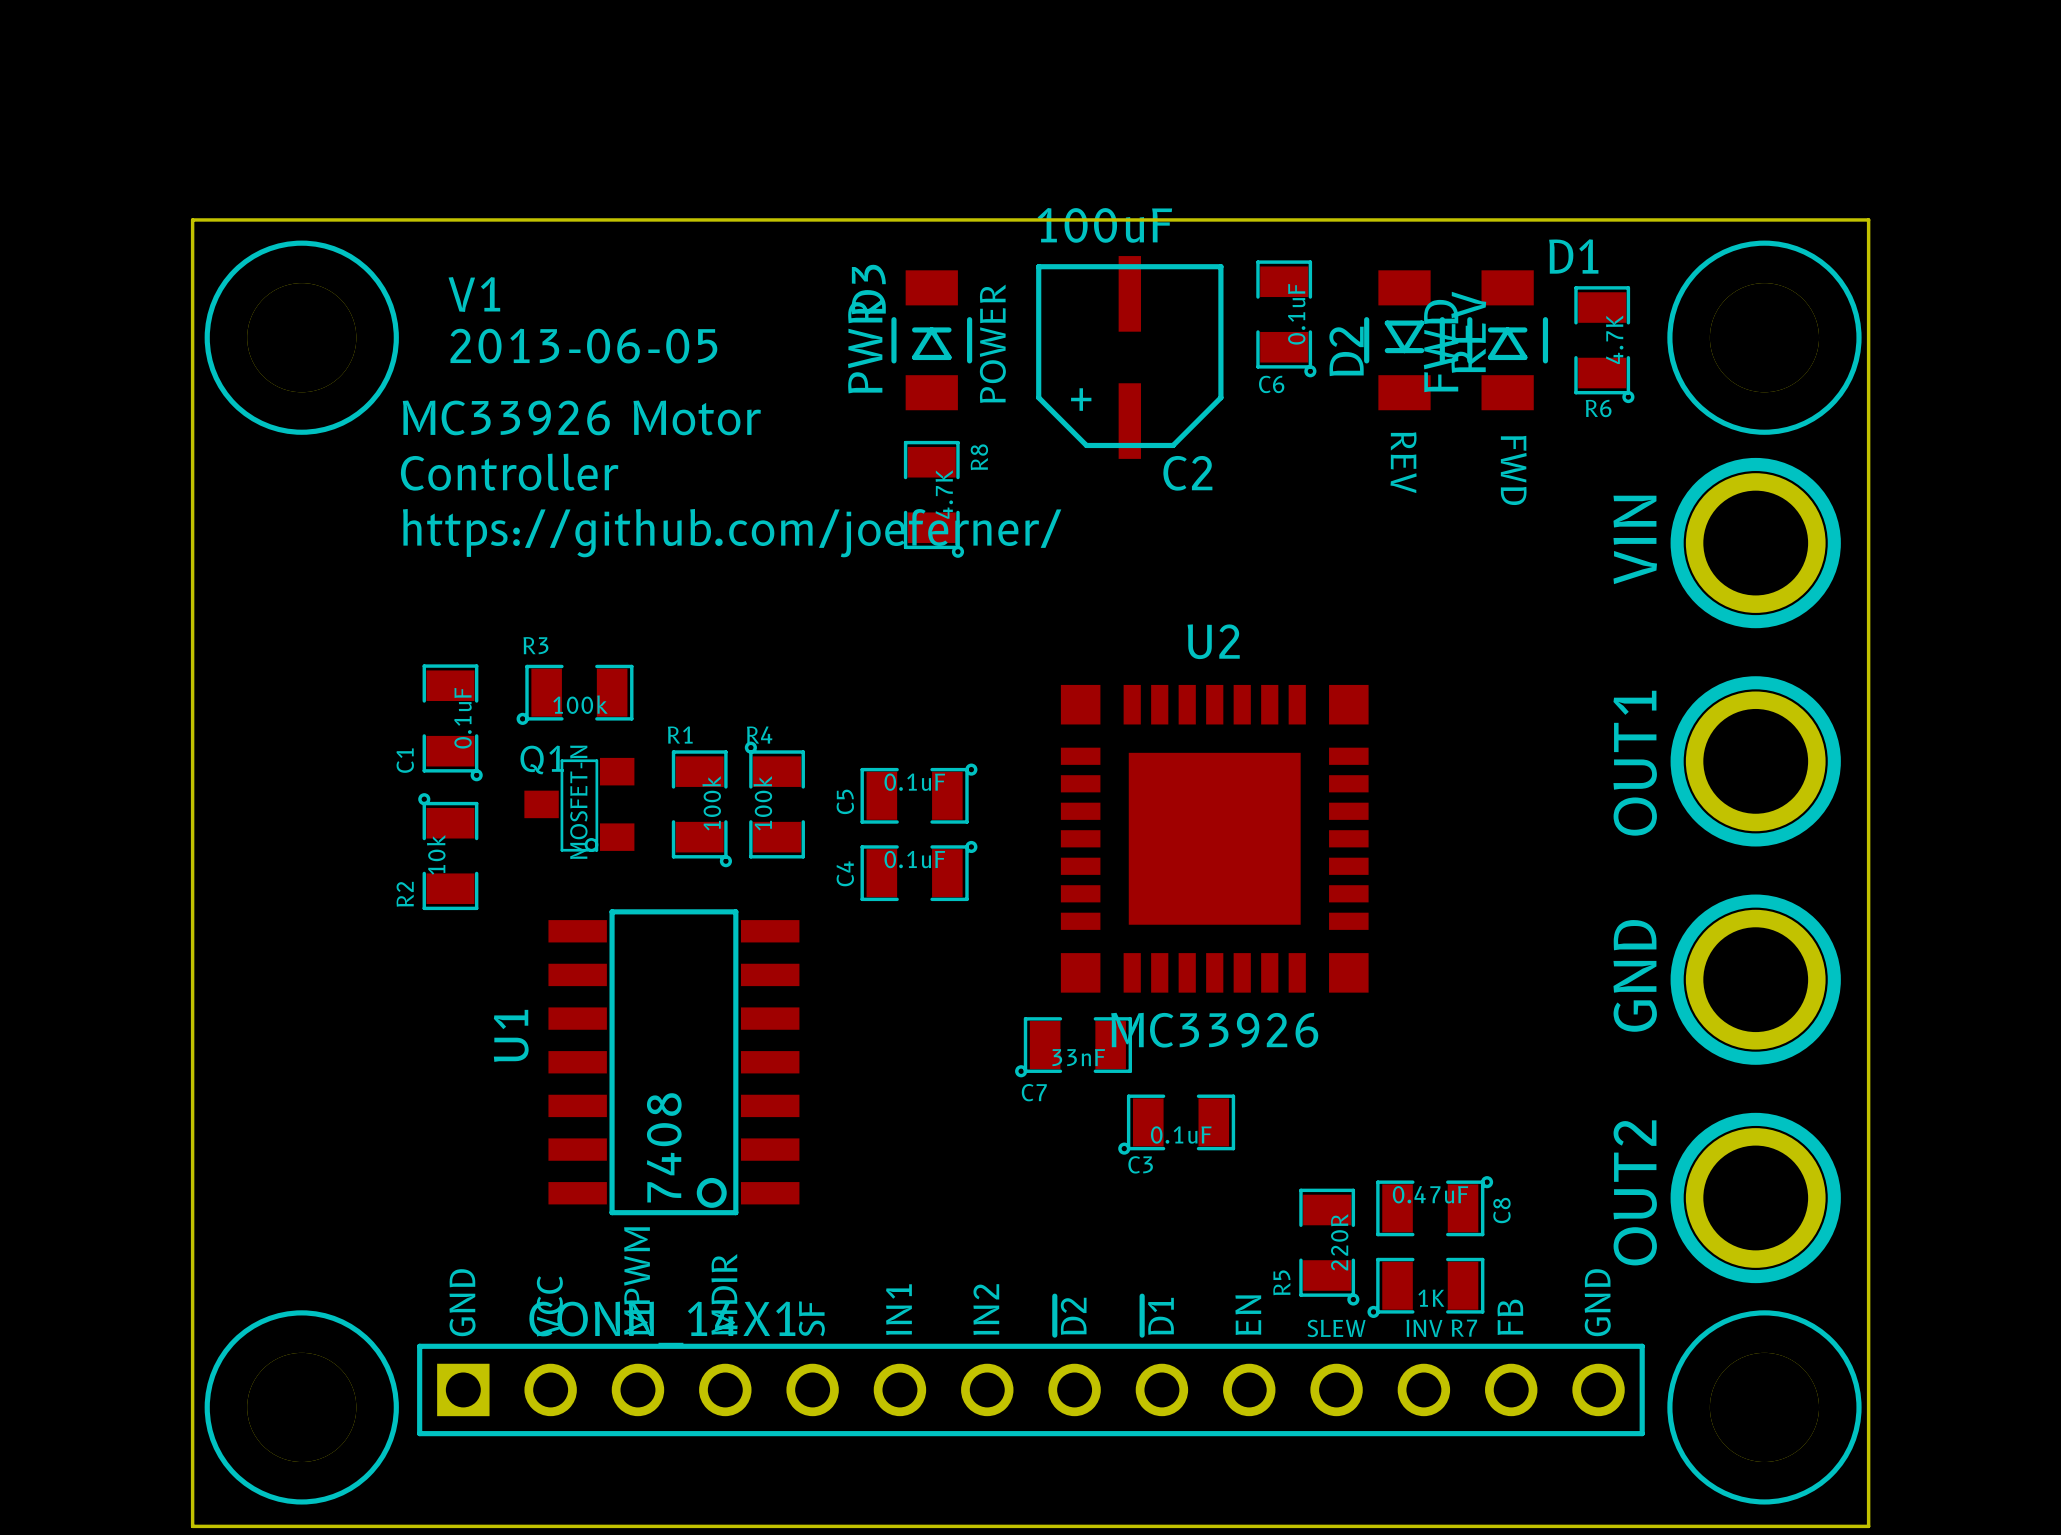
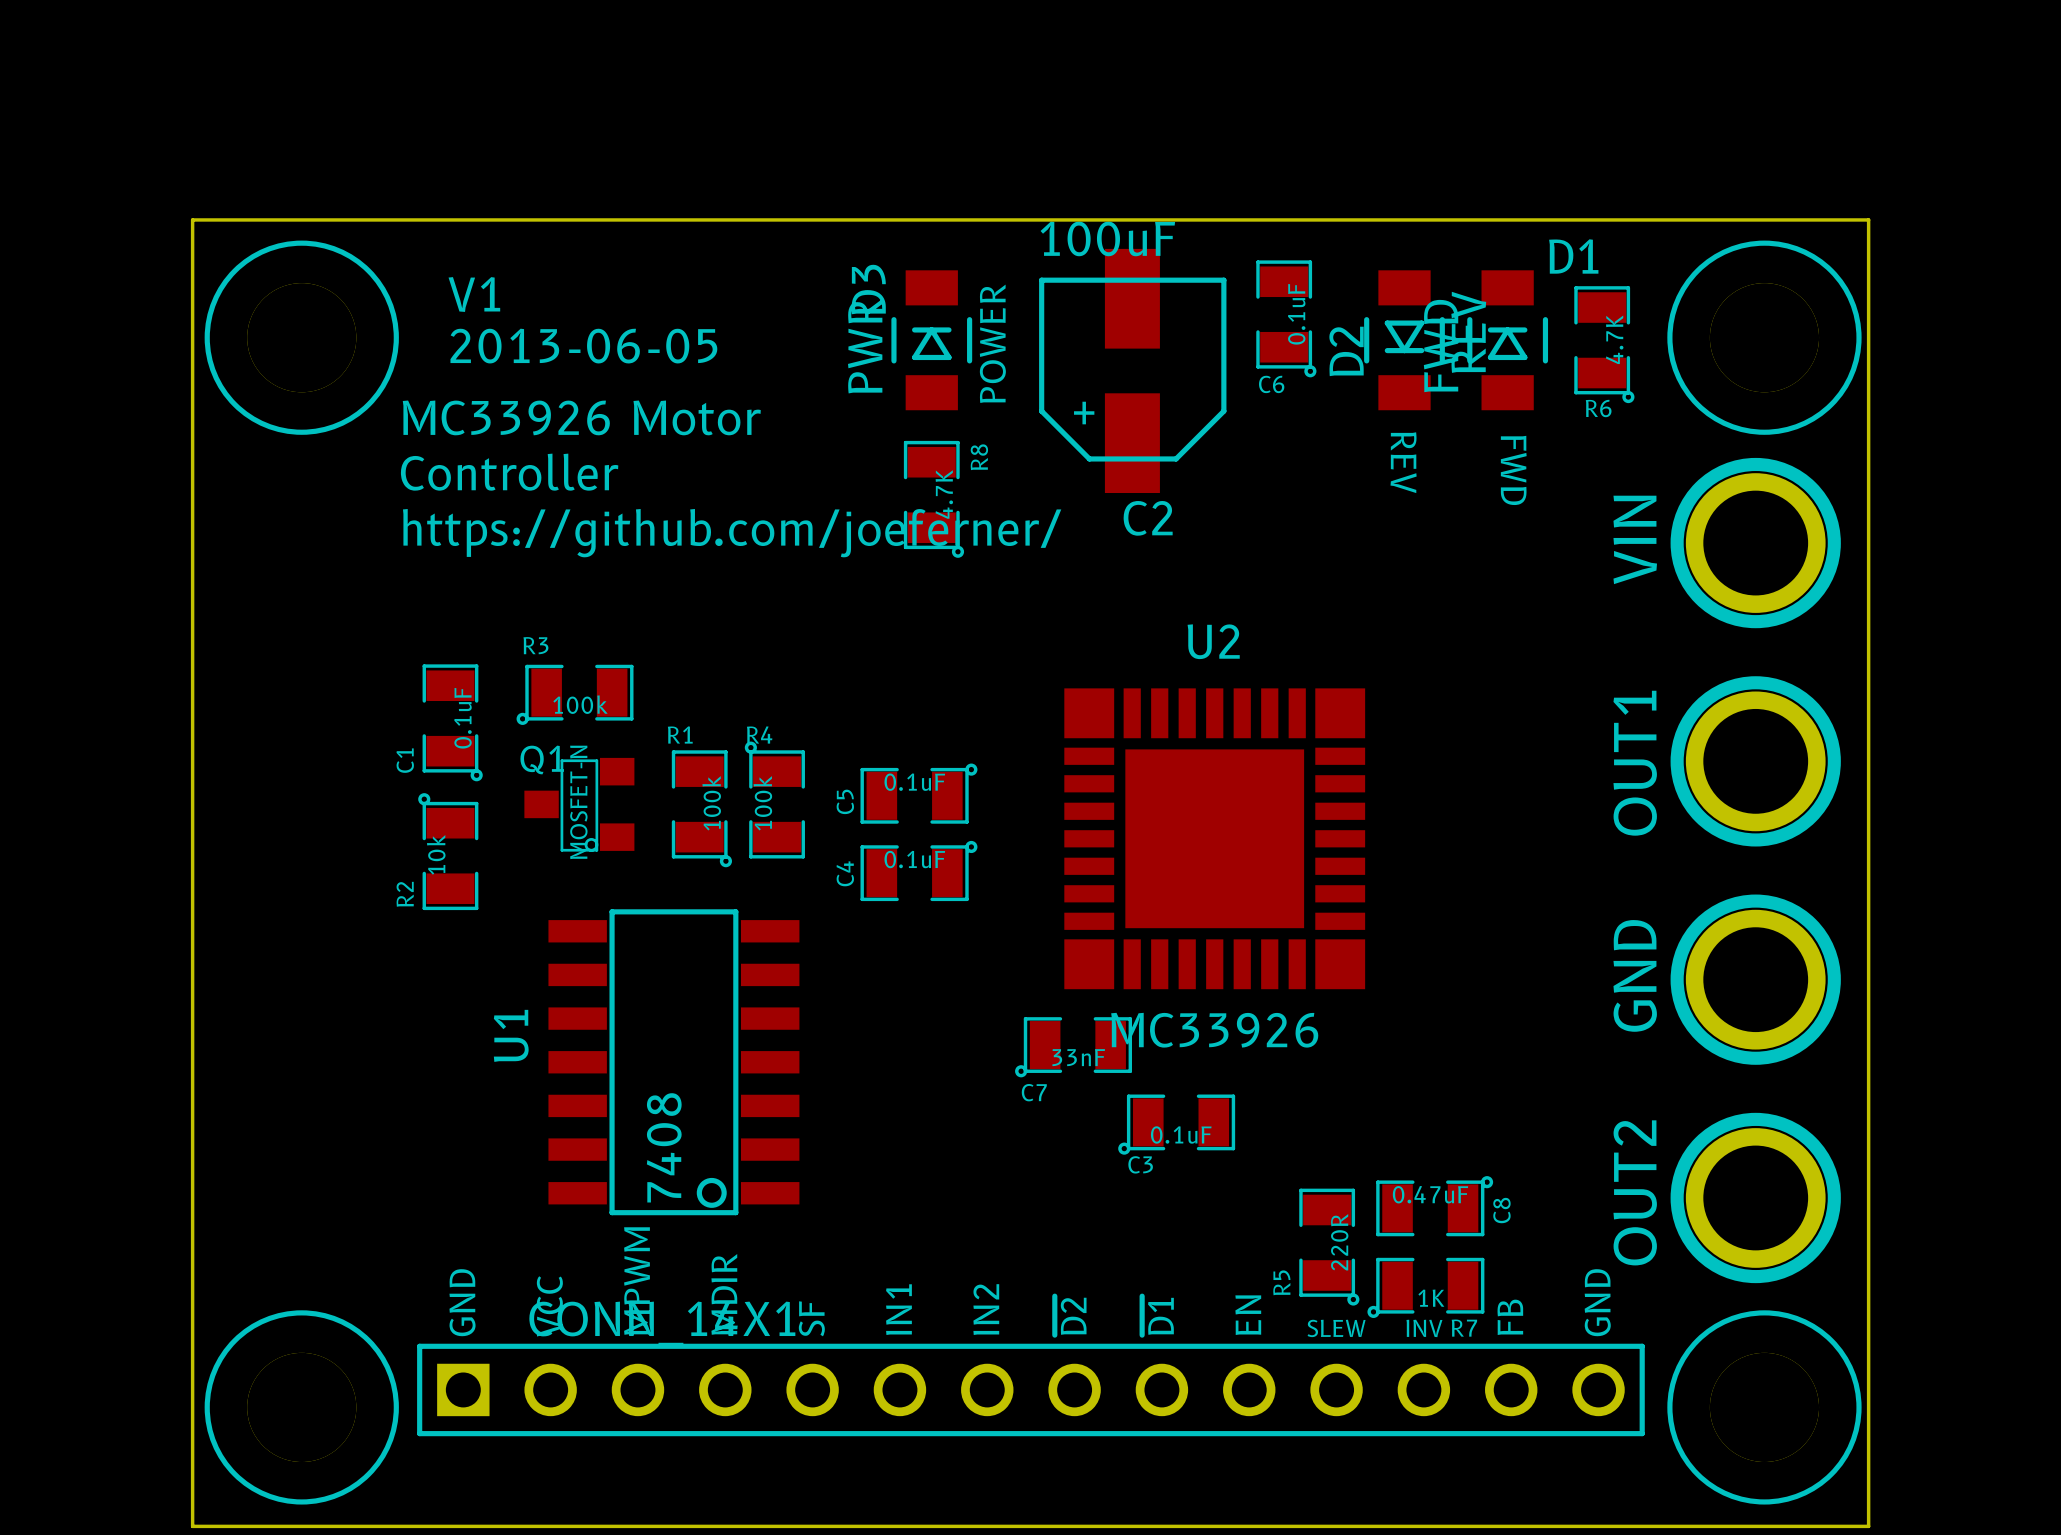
C2 footprint: [1036, 256, 1224, 459] -> [1039, 248, 1227, 493]
U2 footprint: [1060, 684, 1369, 993] -> [1064, 688, 1366, 990]

